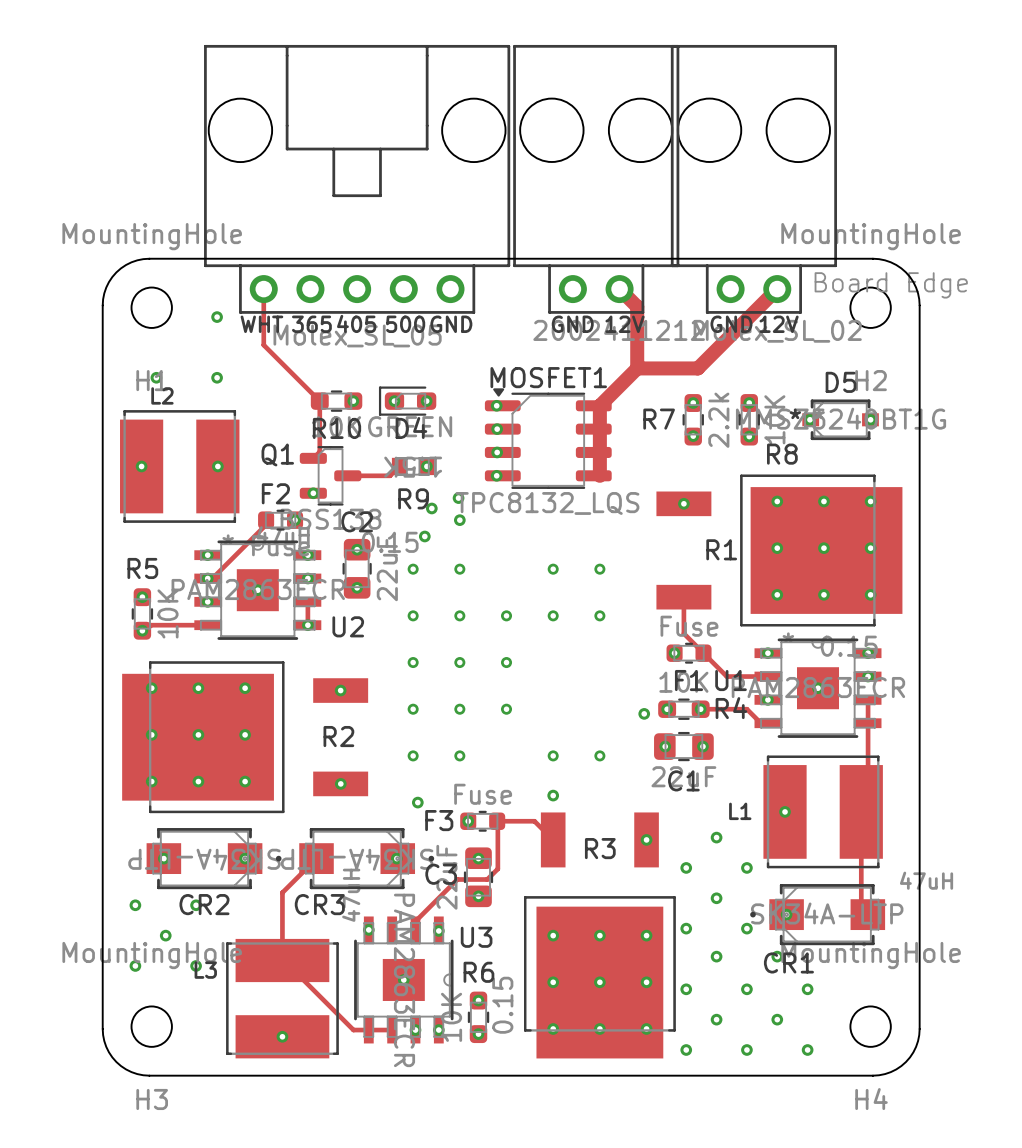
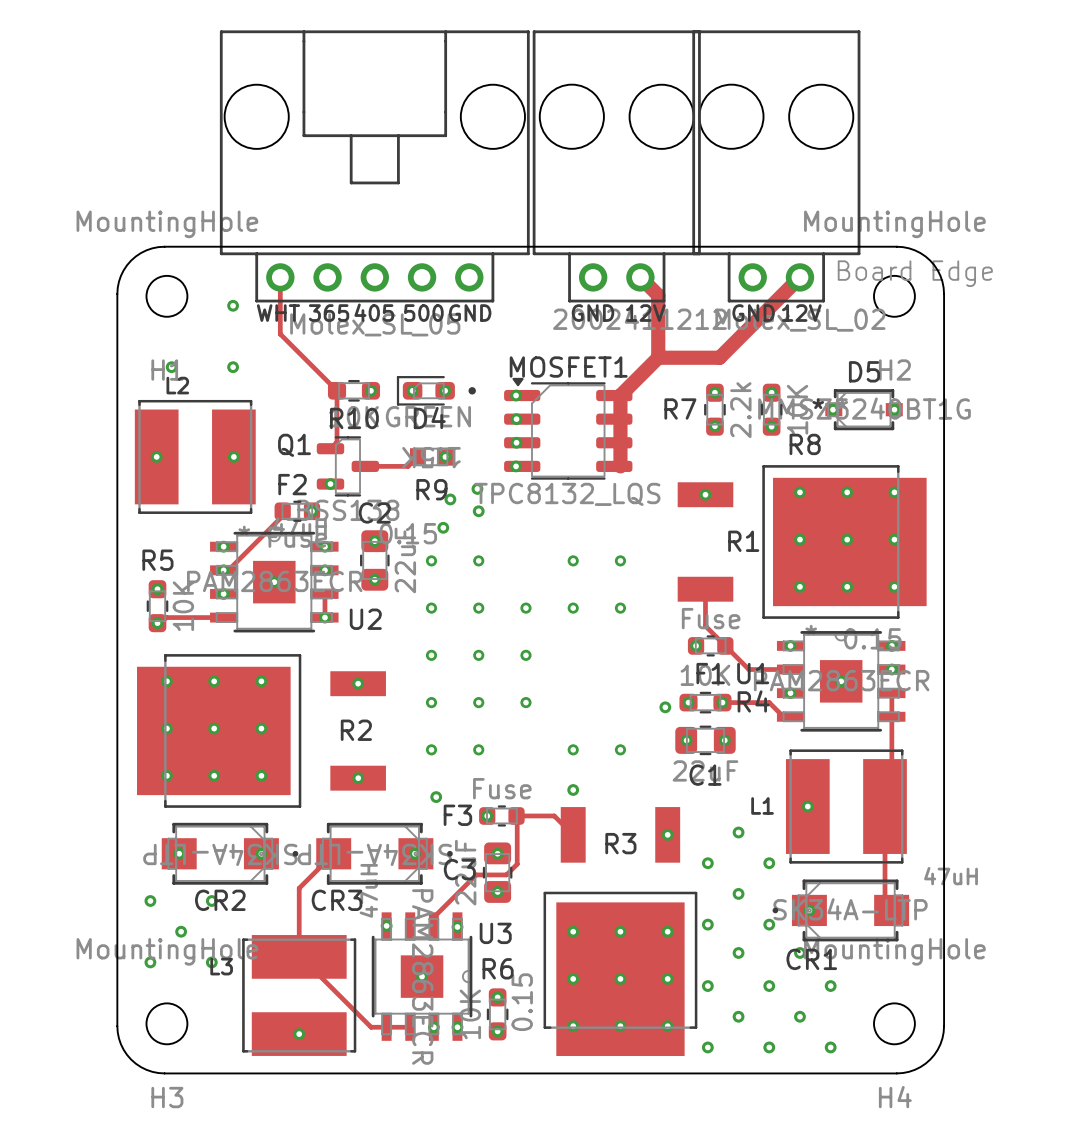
D4 footprint: [378, 386, 437, 416] -> [396, 376, 476, 406]

